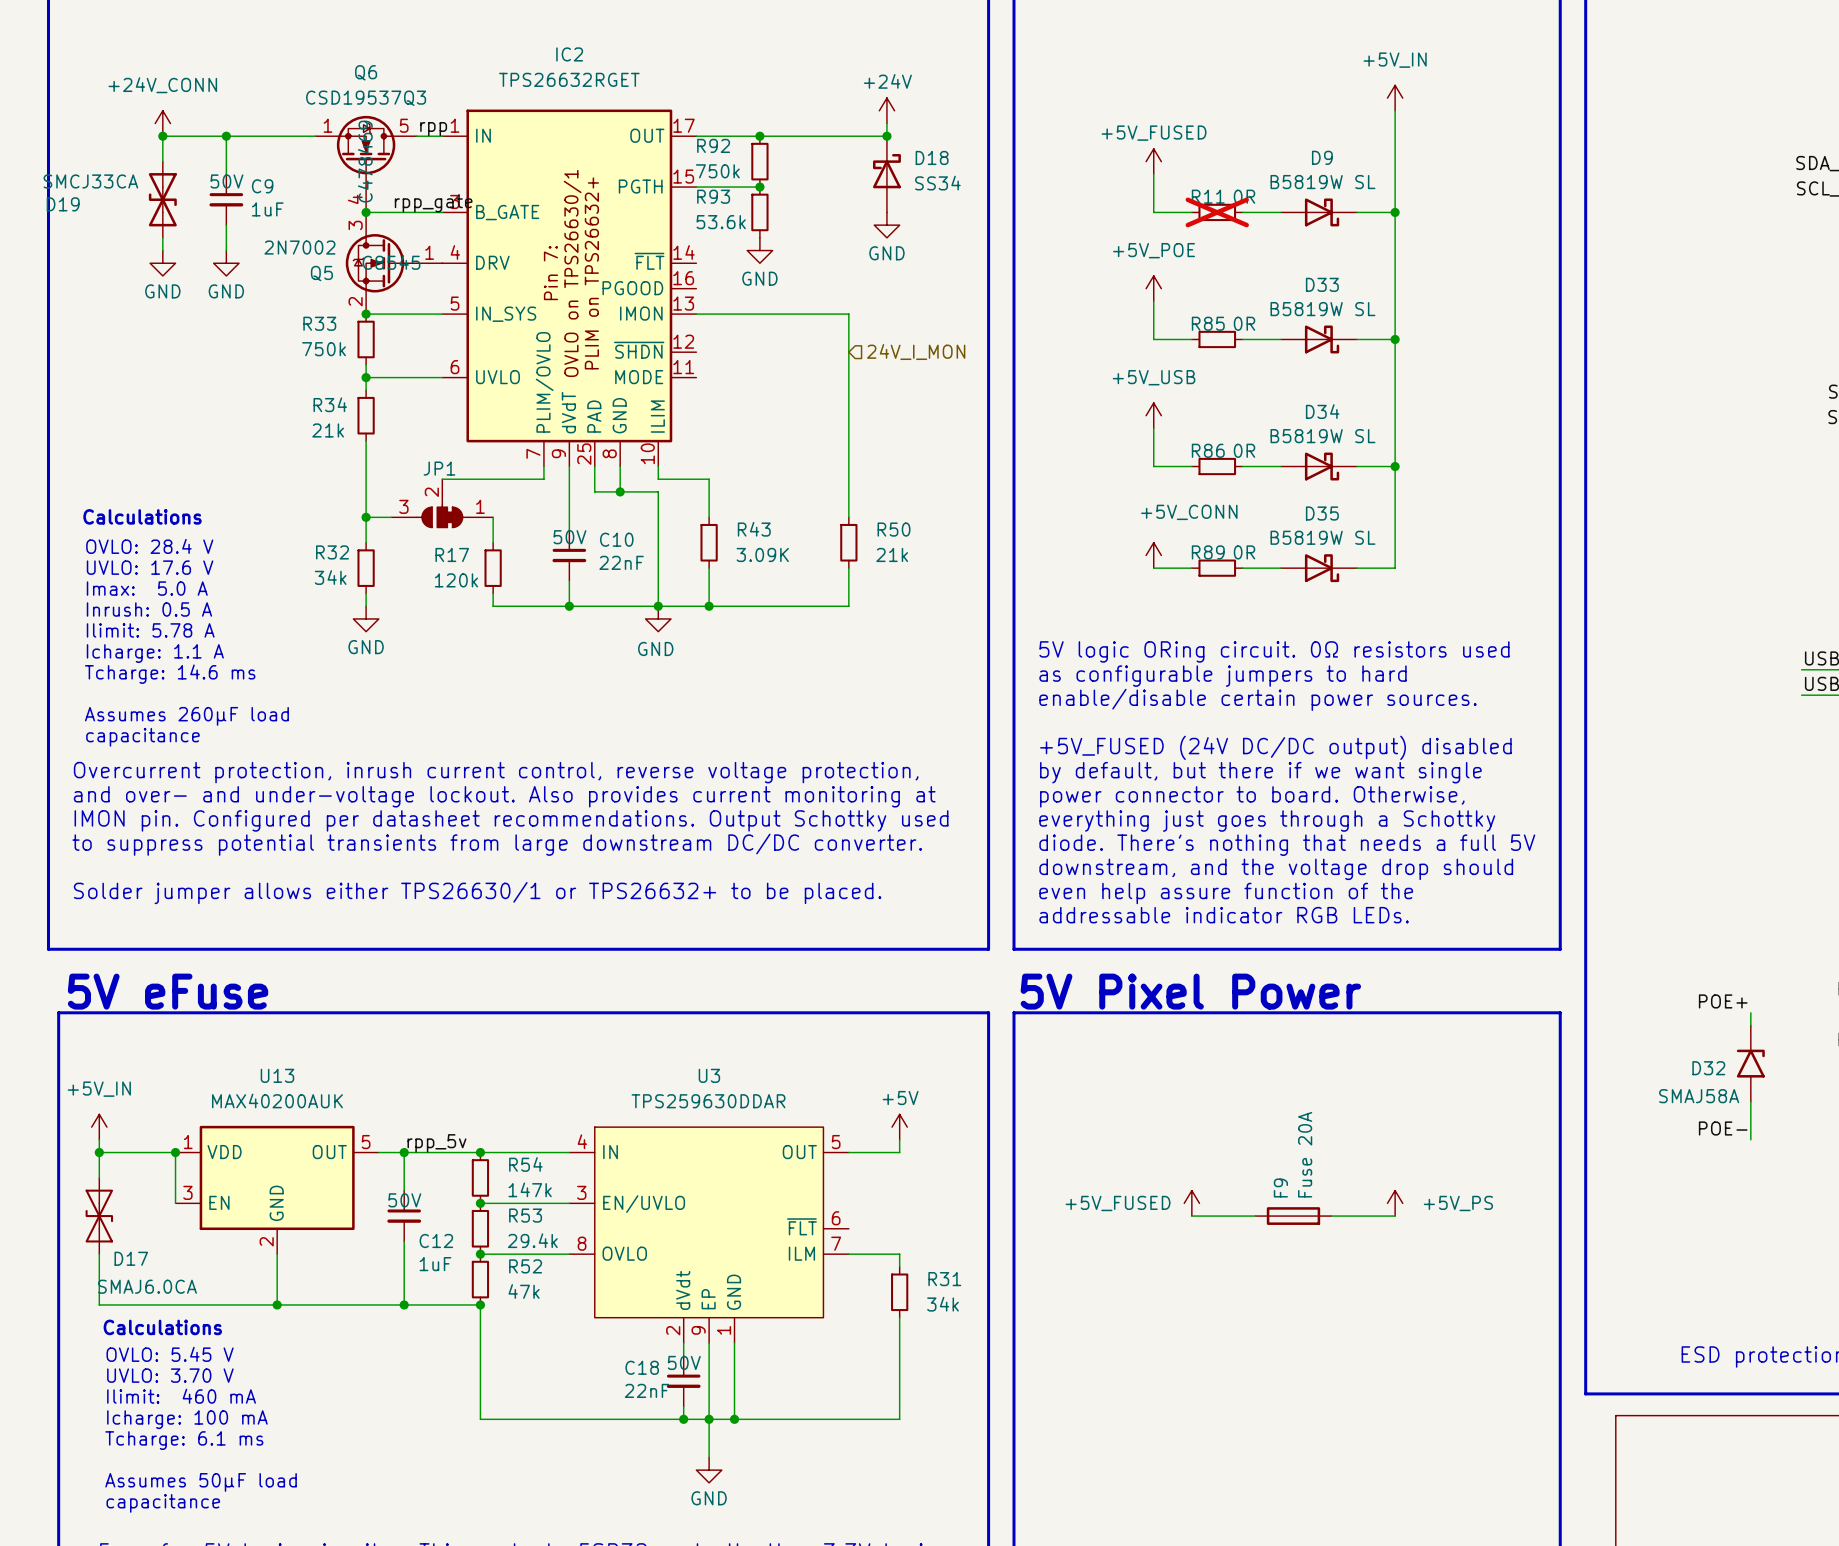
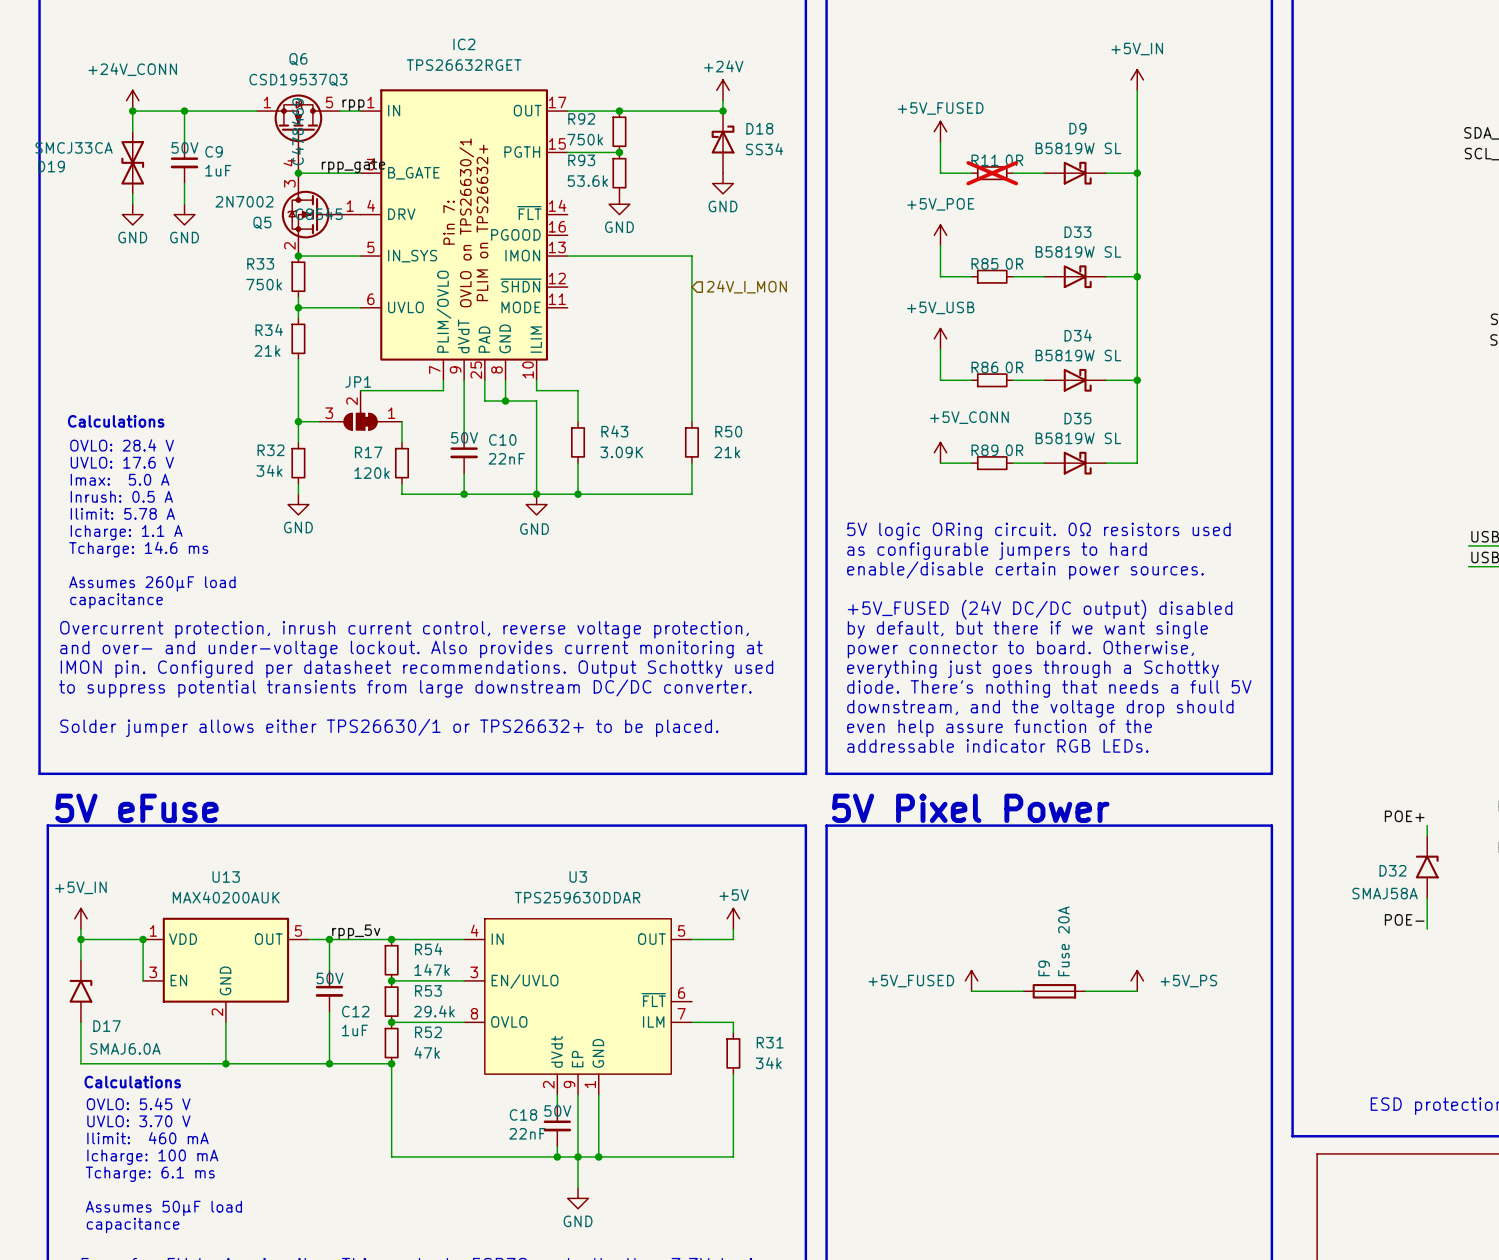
D17 symbol: [85, 1177, 114, 1255] -> [69, 960, 93, 1023]
D17 value: SMAJ6.0CA (147, 1286) -> SMAJ6.0A (125, 1048)

